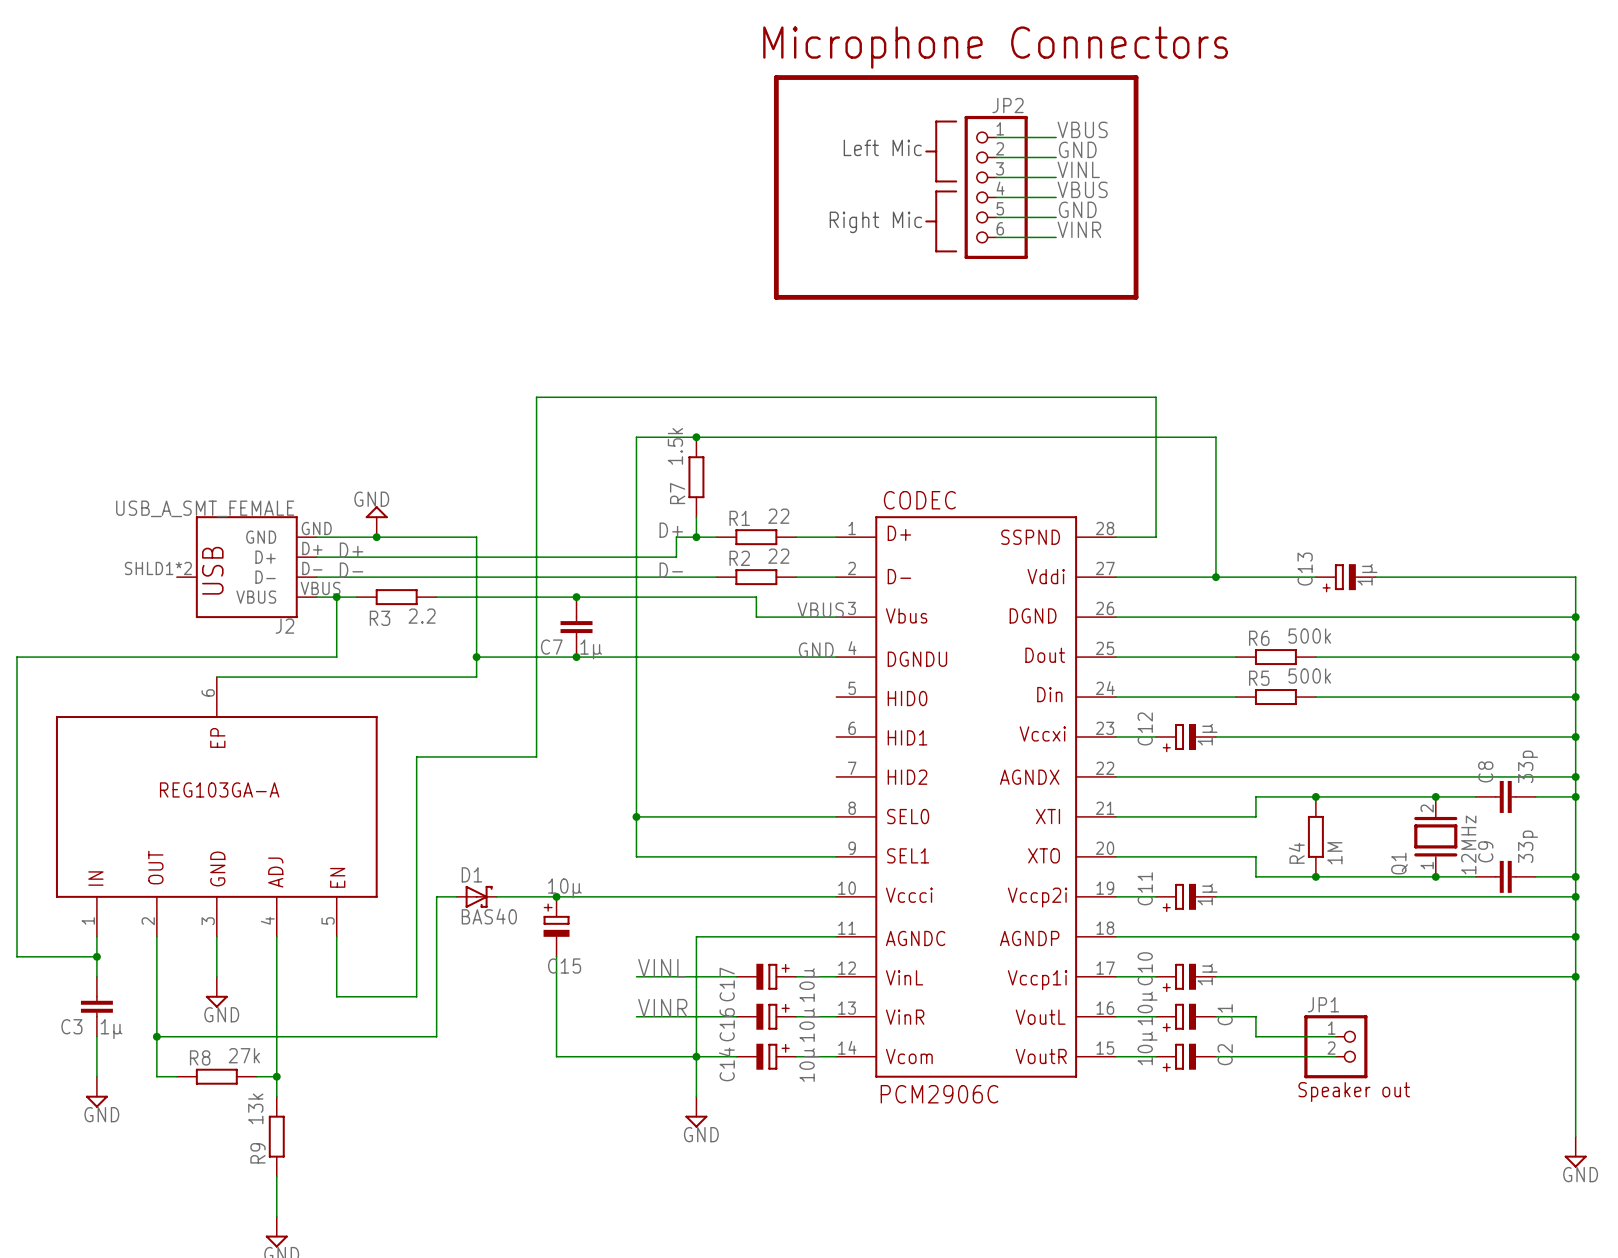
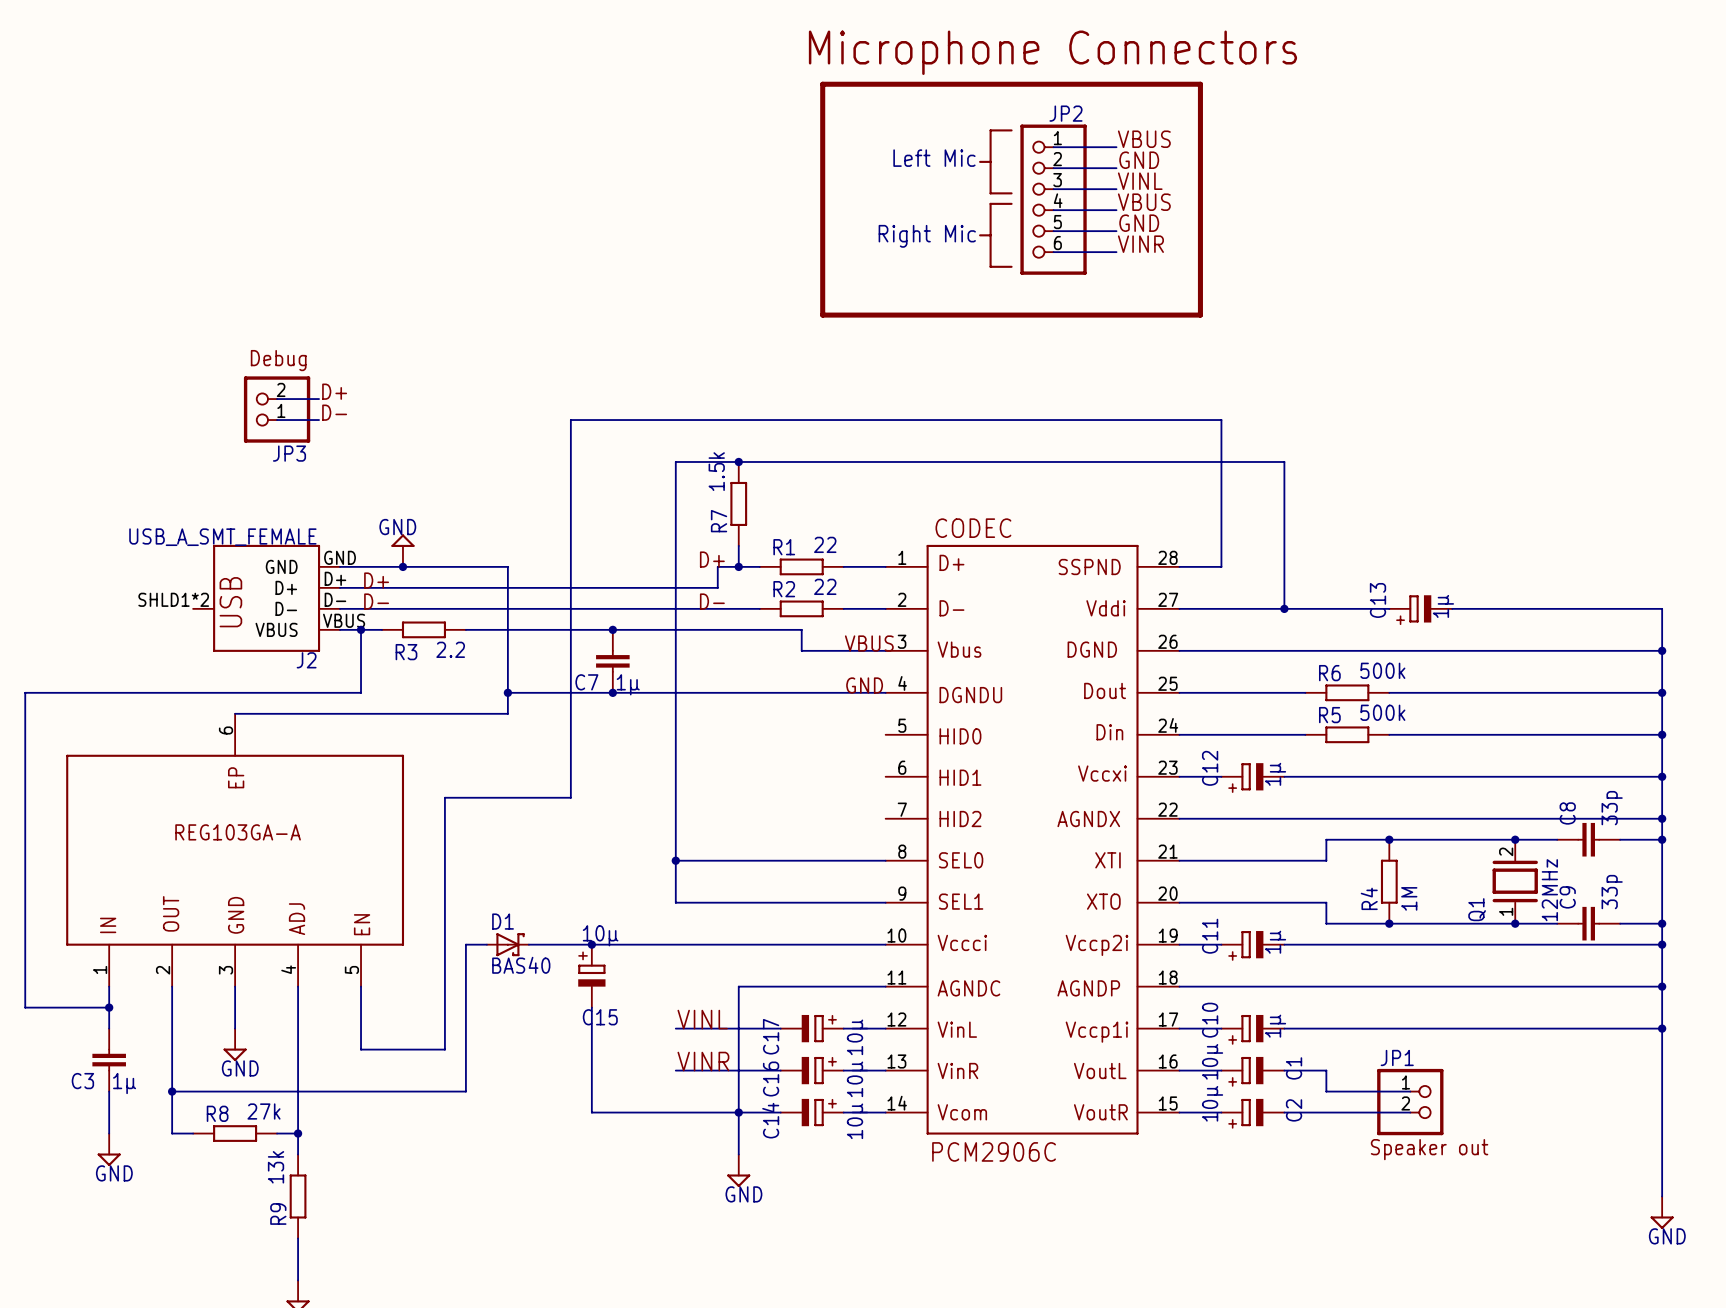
text: none -> Debug (278, 360)
label: none -> D+ (334, 391)
wire: none -> (277, 399) (319, 399)
JP3: none -> (277, 409)
label: none -> D- (334, 412)
wire: none -> (277, 420) (319, 420)

